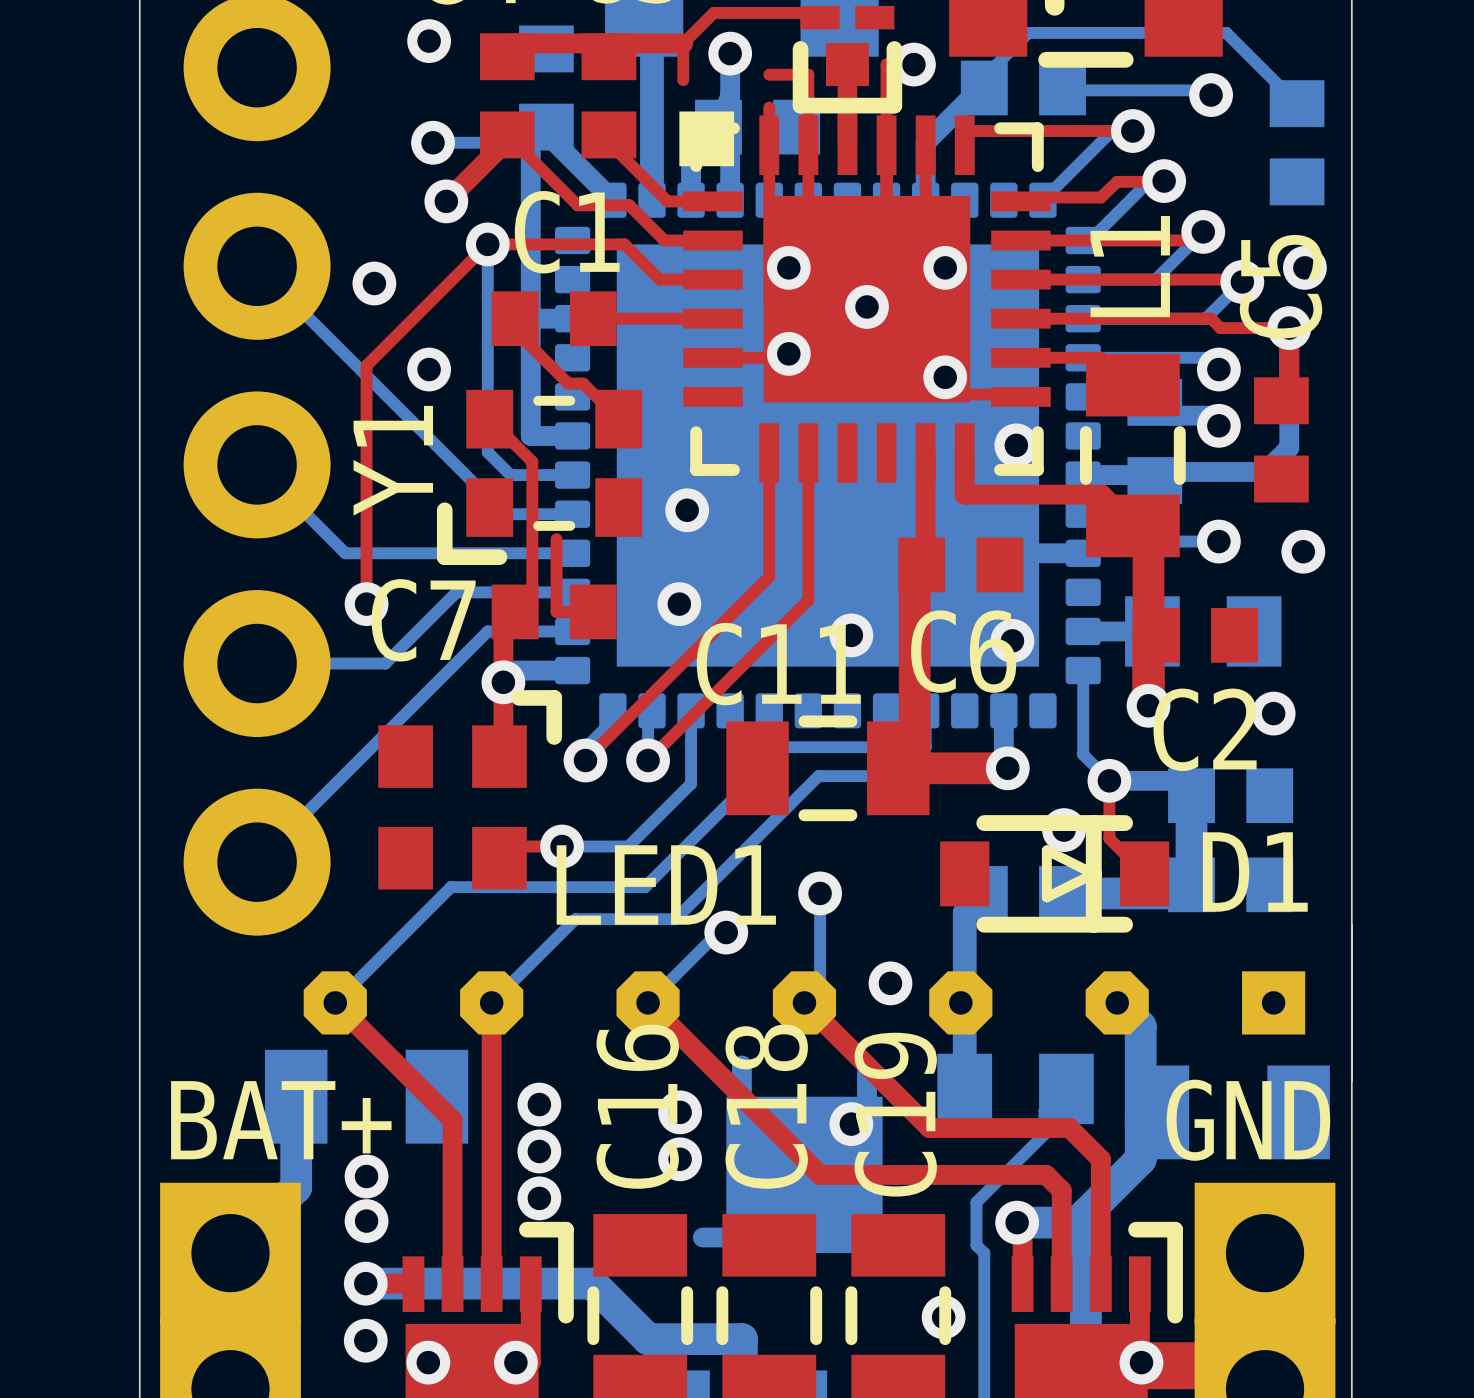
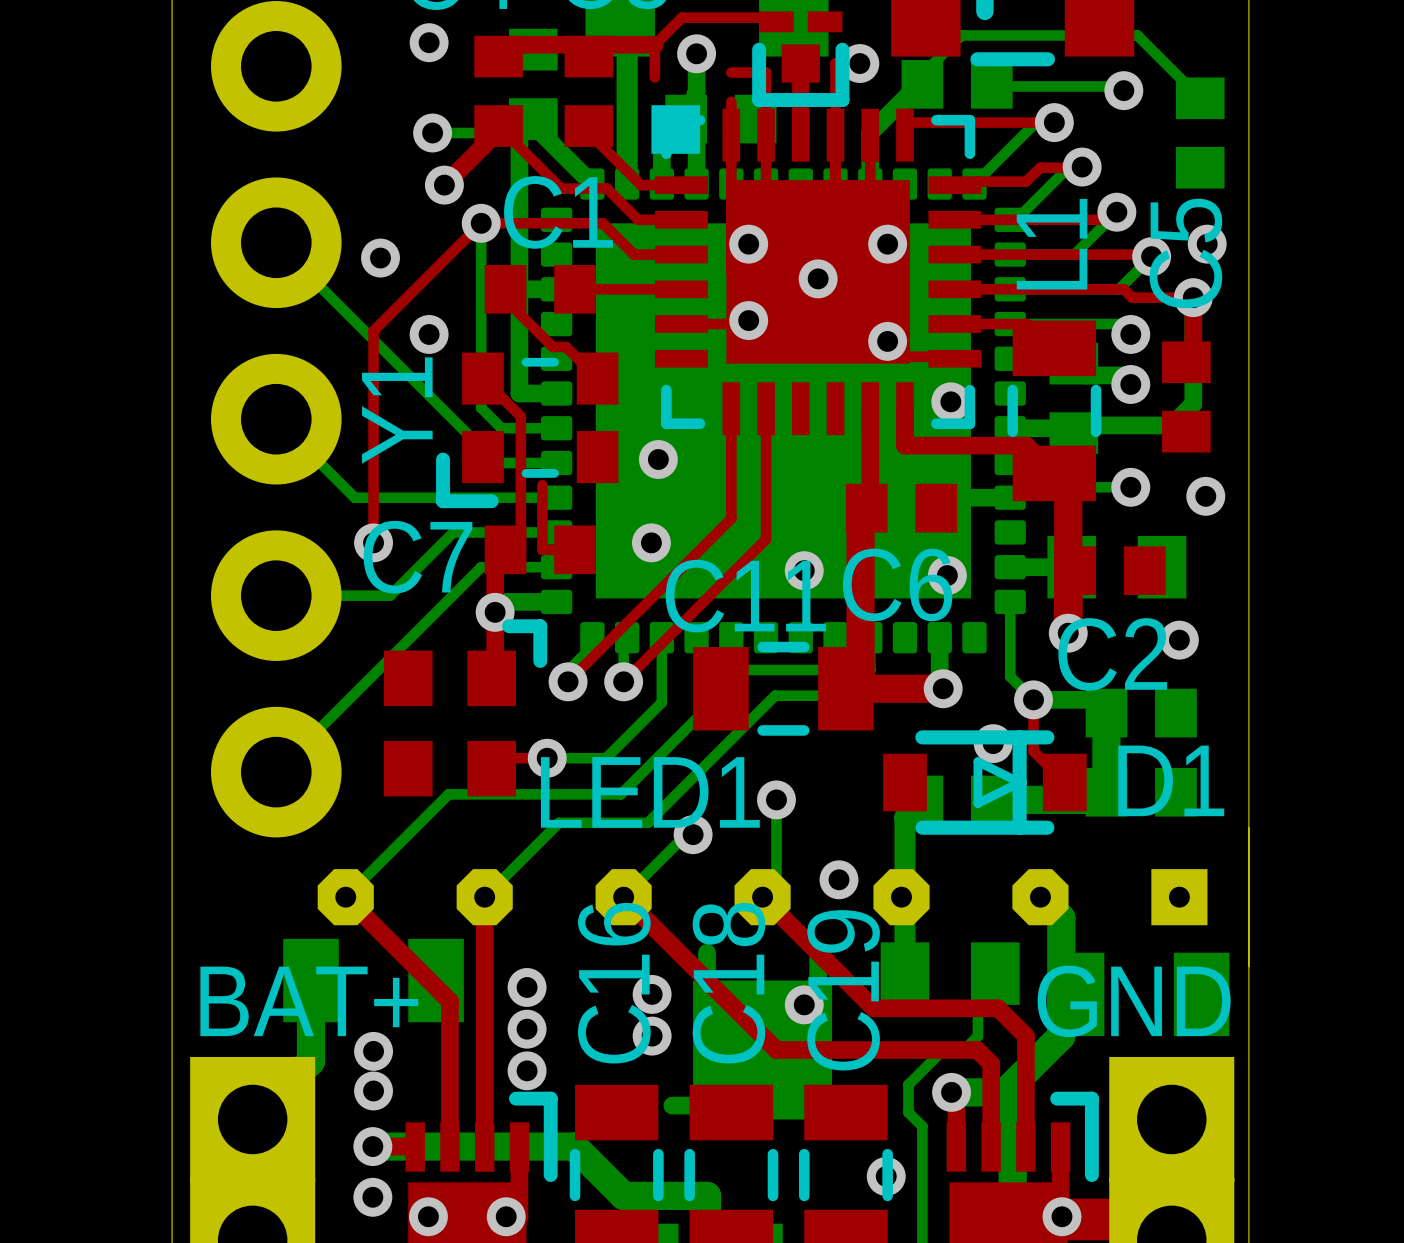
bottom track: (1066, 1088) (1044, 1110) (1044, 1134) (976, 1202) (976, 1245) (984, 1253) (984, 1260) -> (995, 973) (977, 973) (977, 1036) (964, 1050) (943, 1050) (908, 1084) (908, 1112) (922, 1126)

